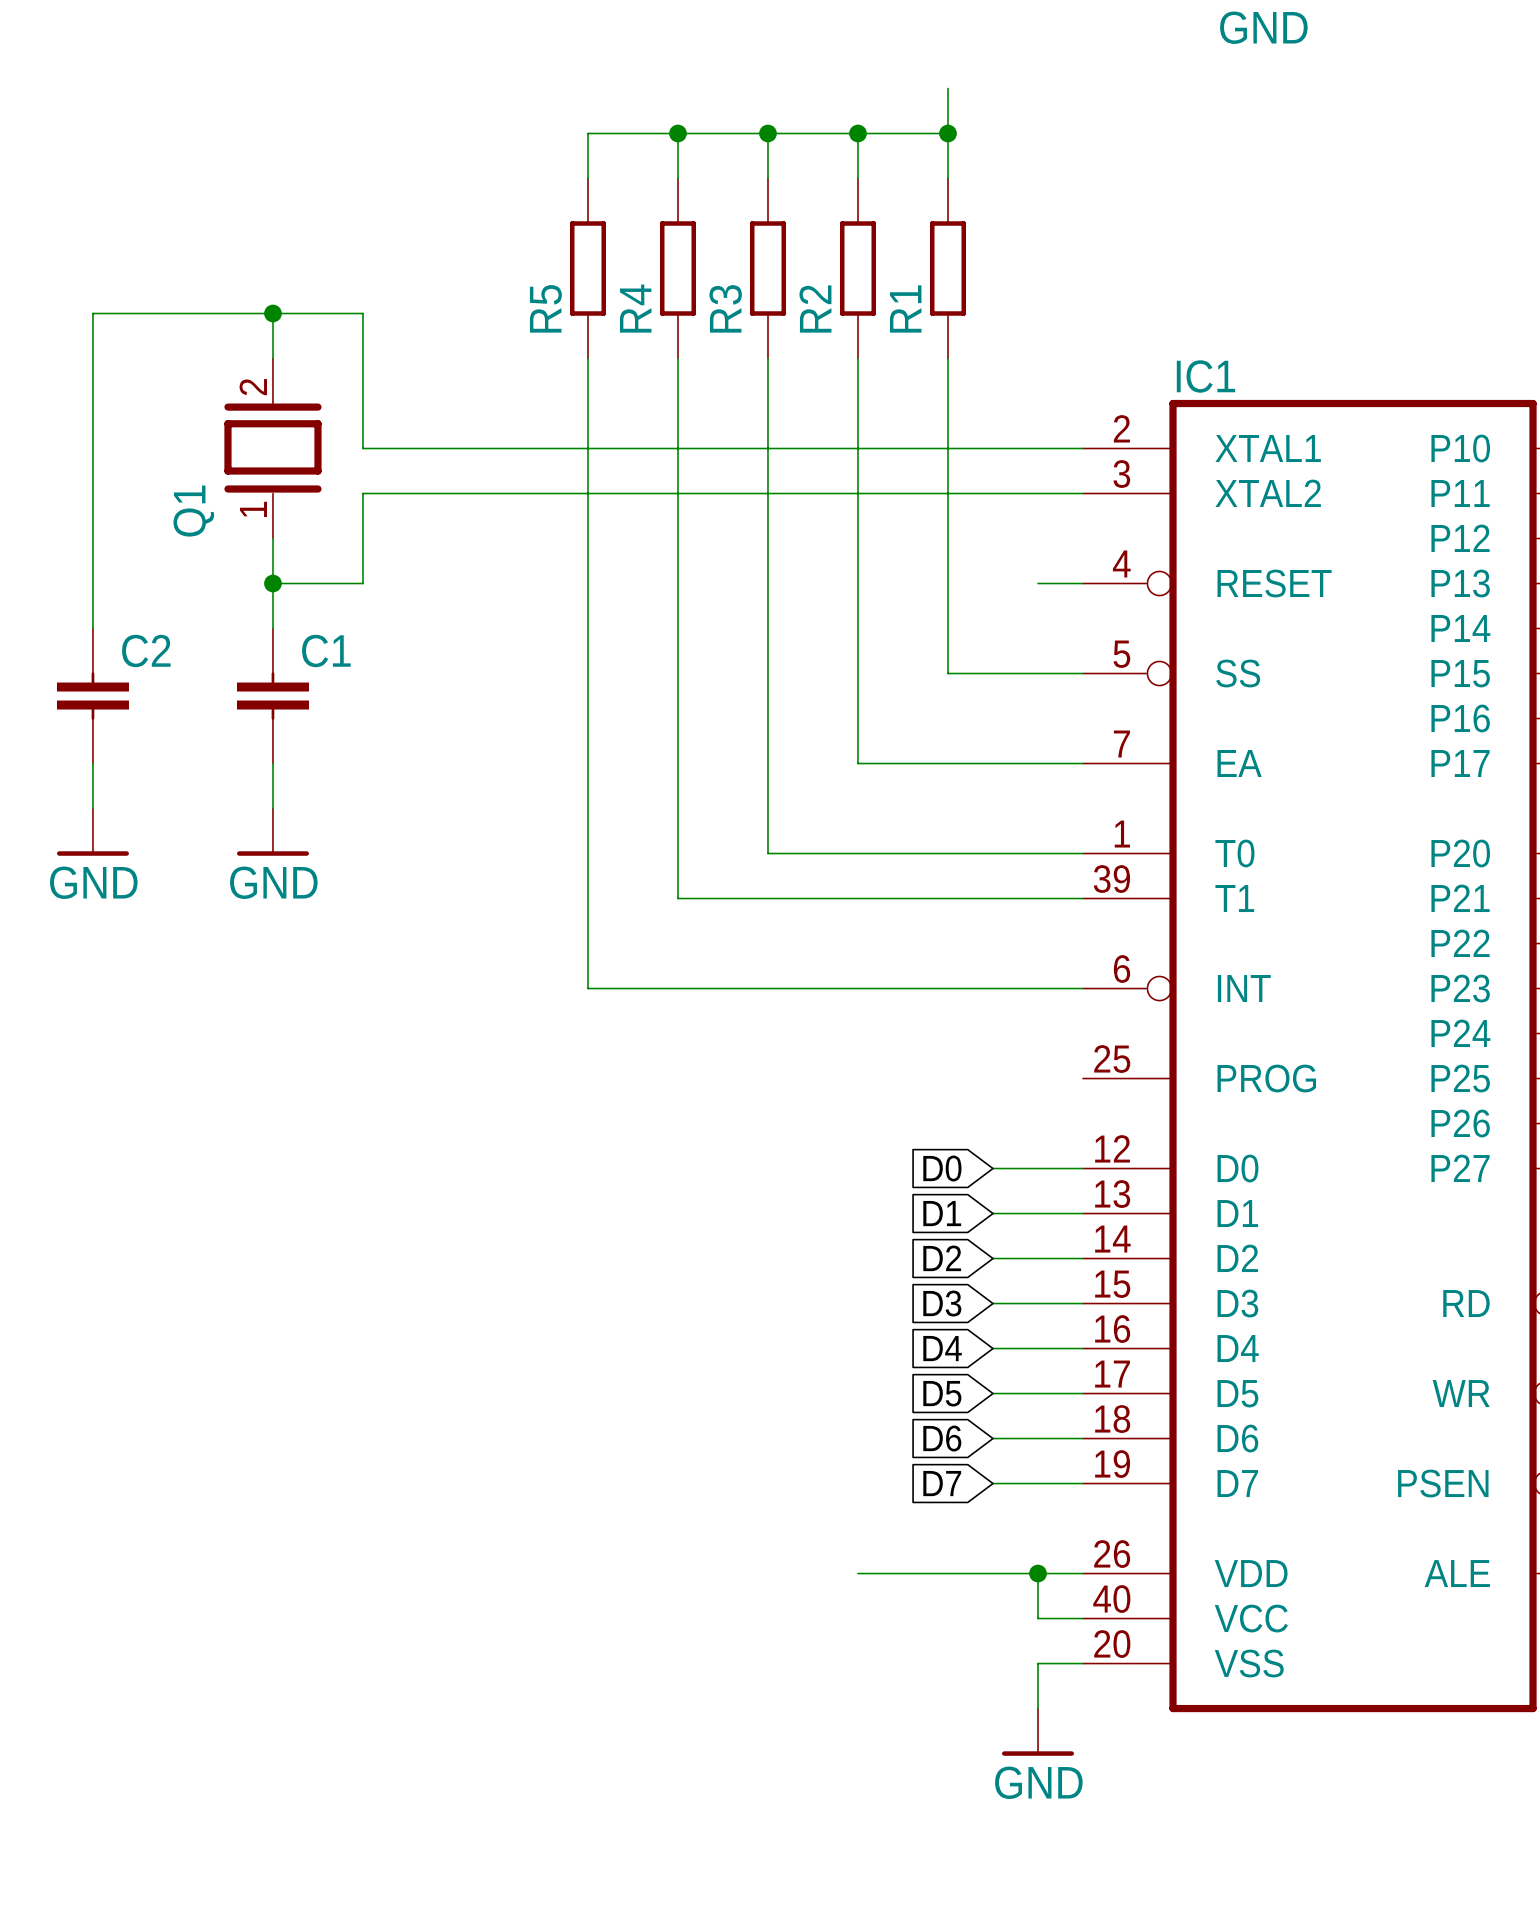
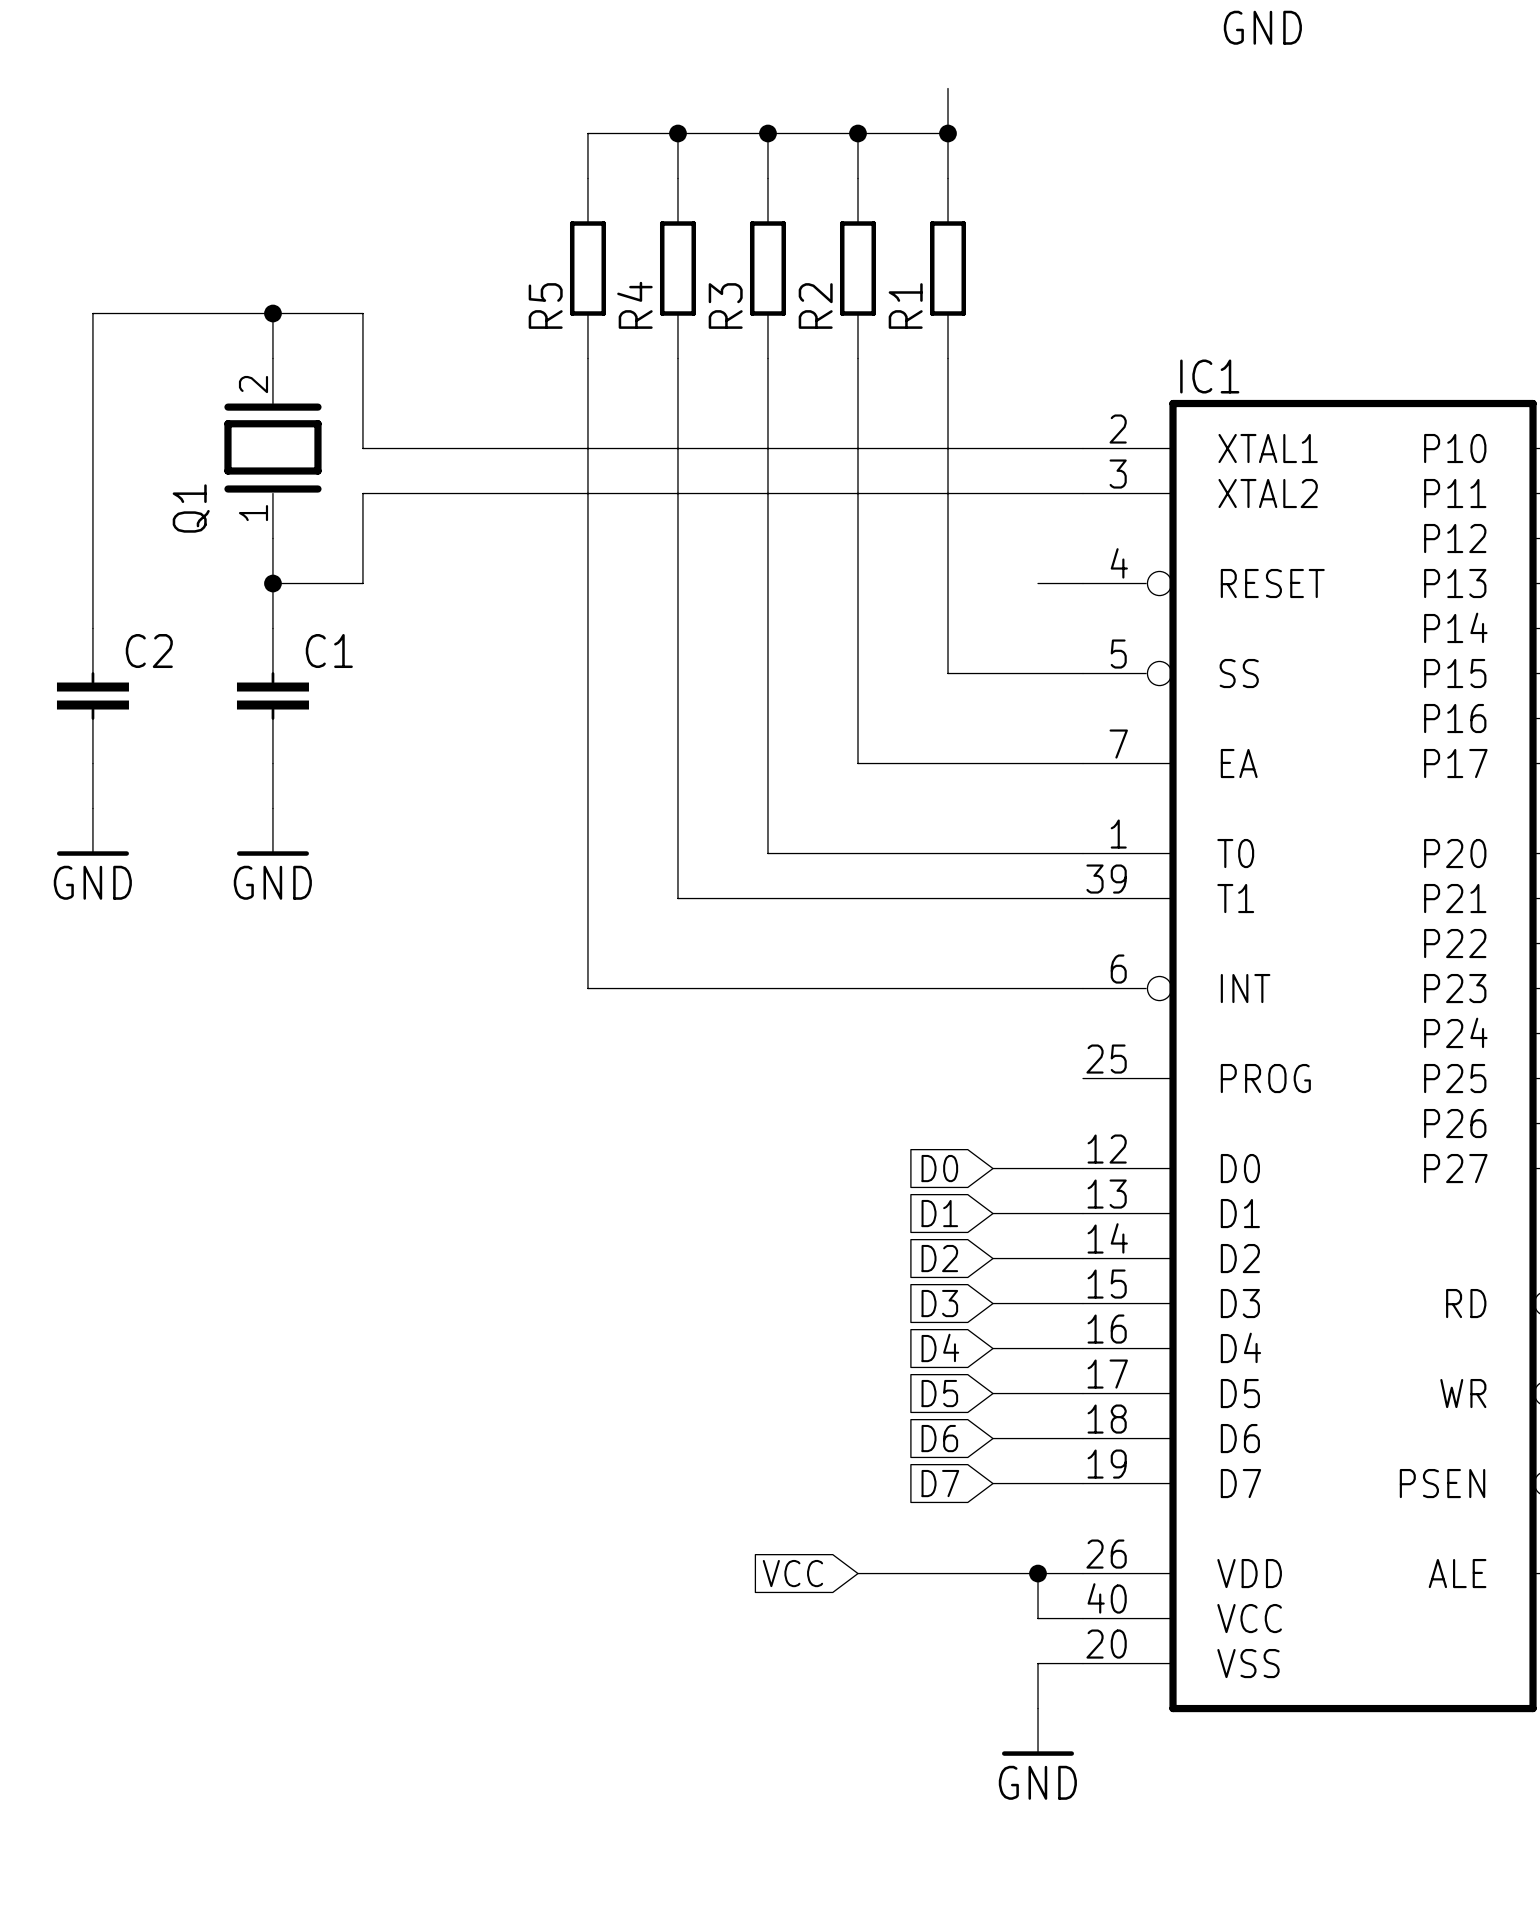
global label: none -> VCC (792, 1573)

